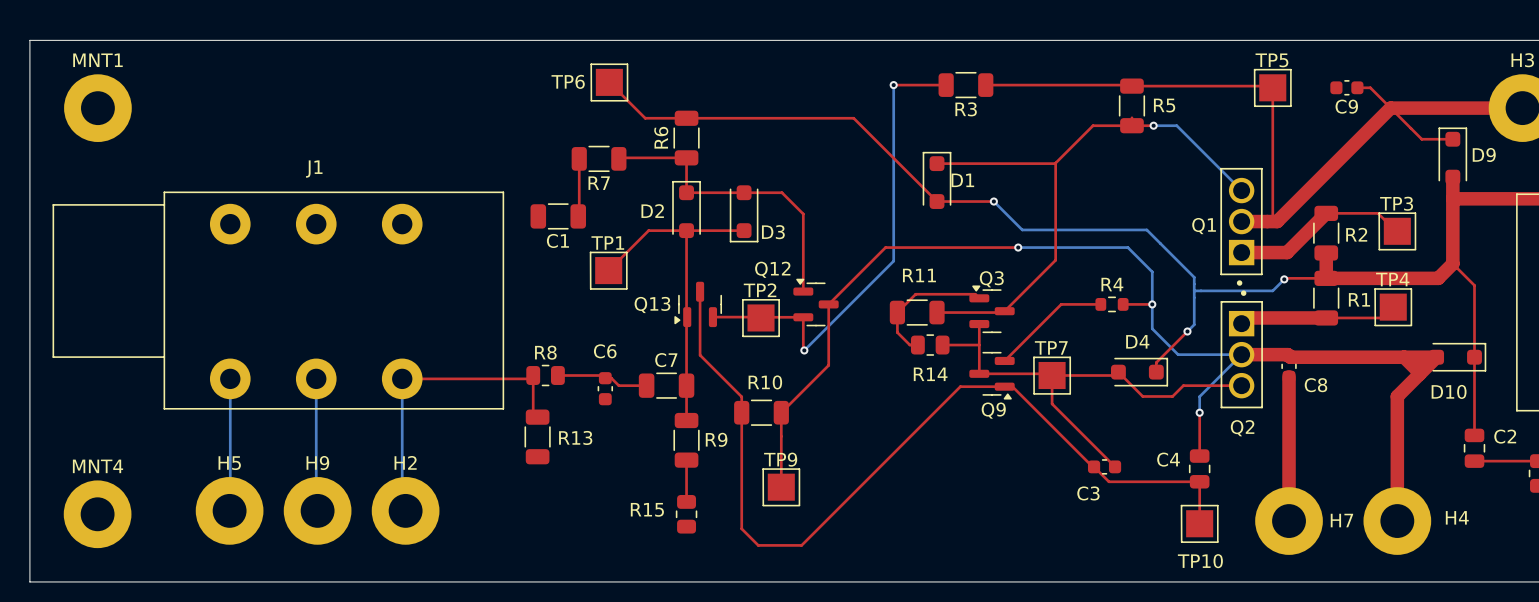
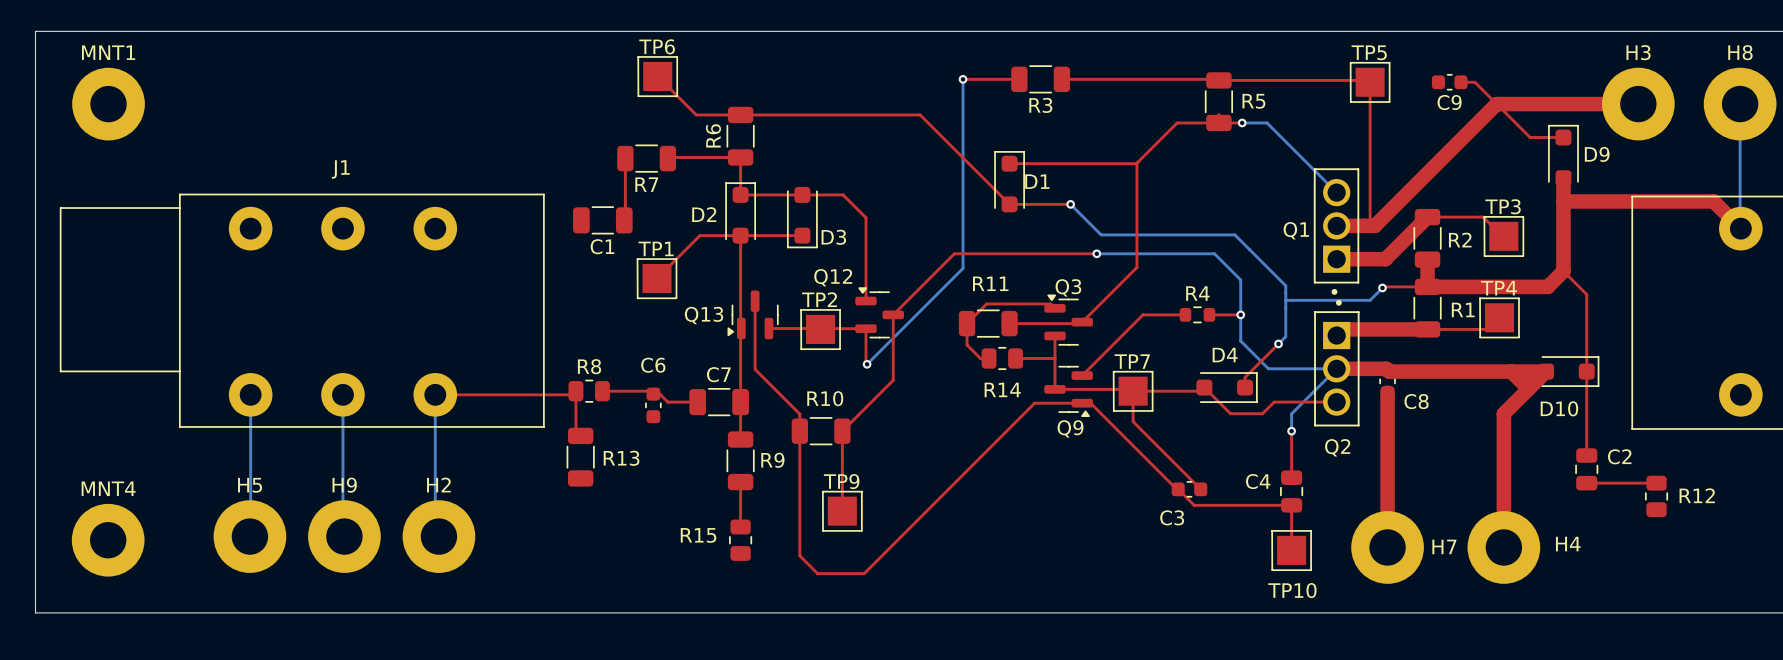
TP6 name position: TP6 (568, 81) -> TP6 (657, 46)

